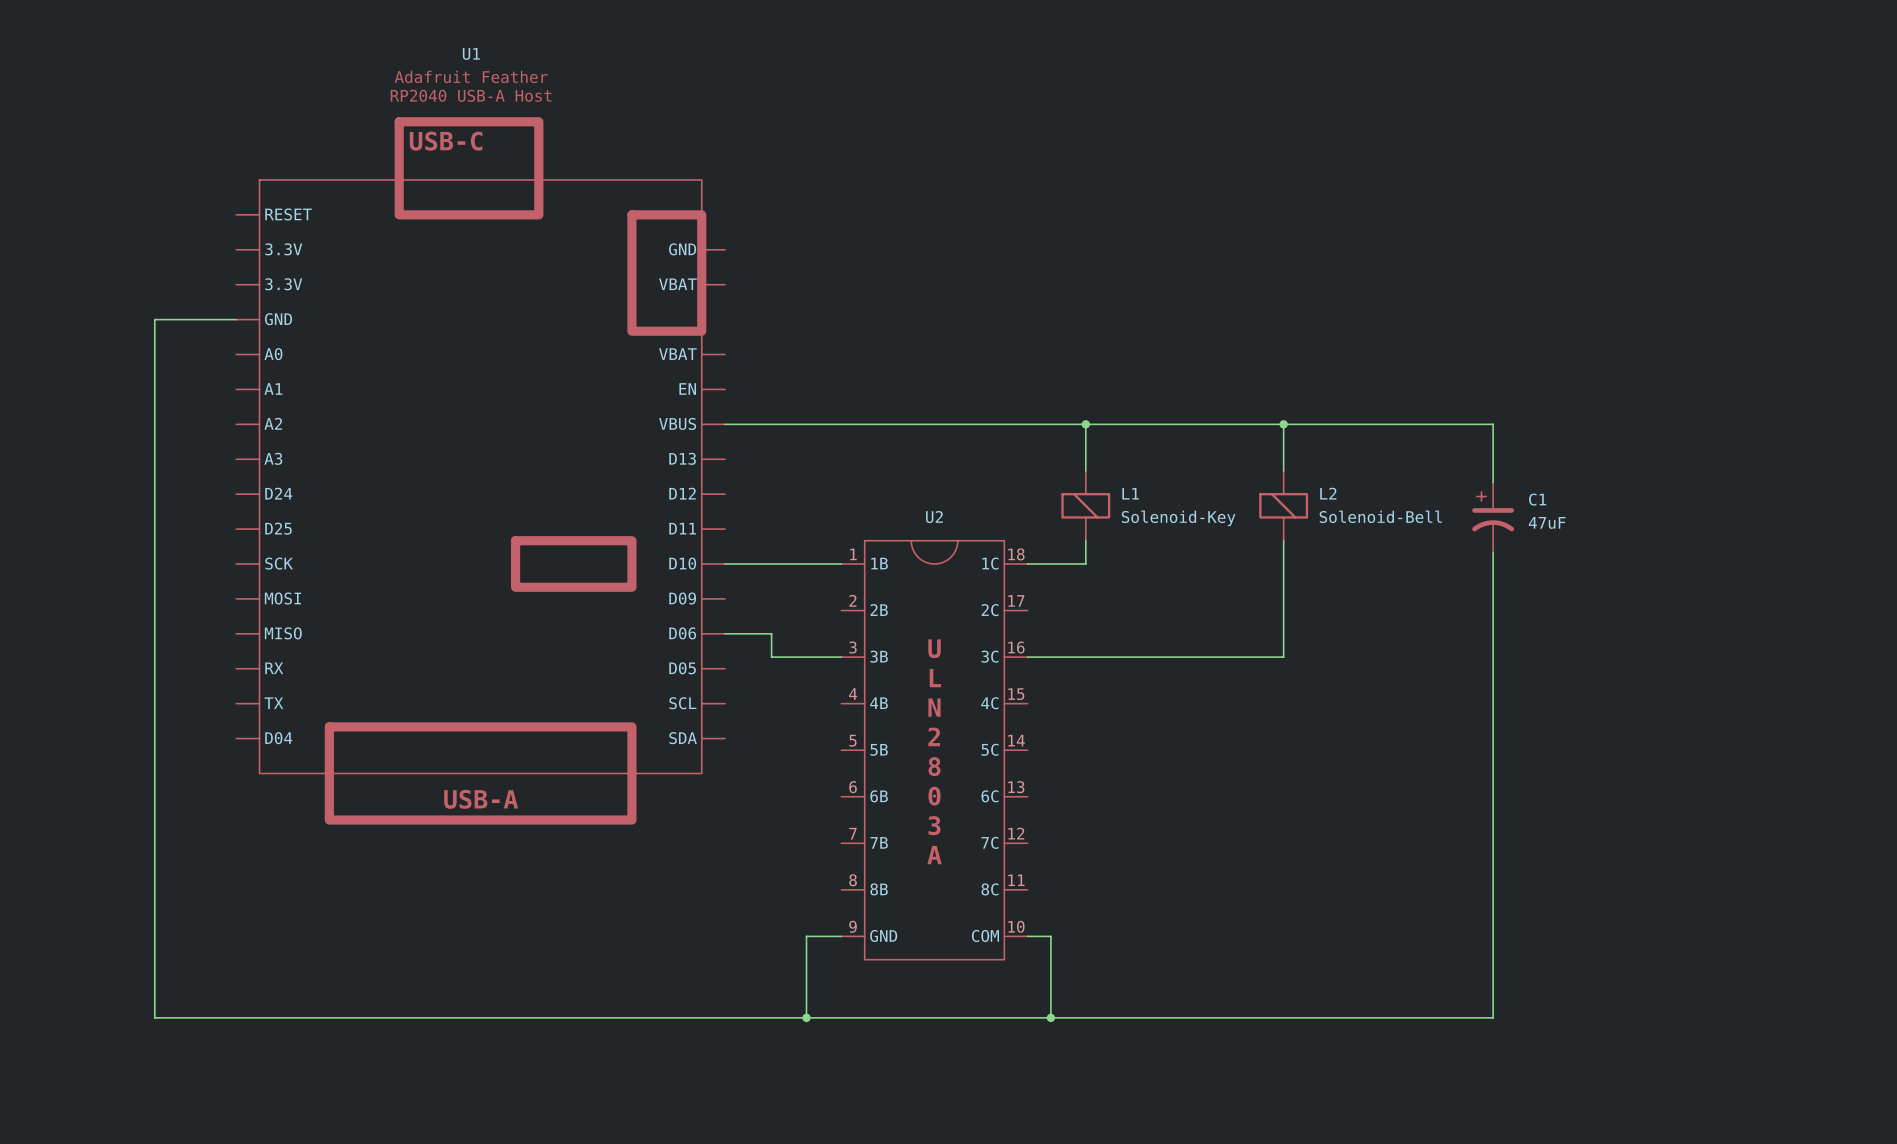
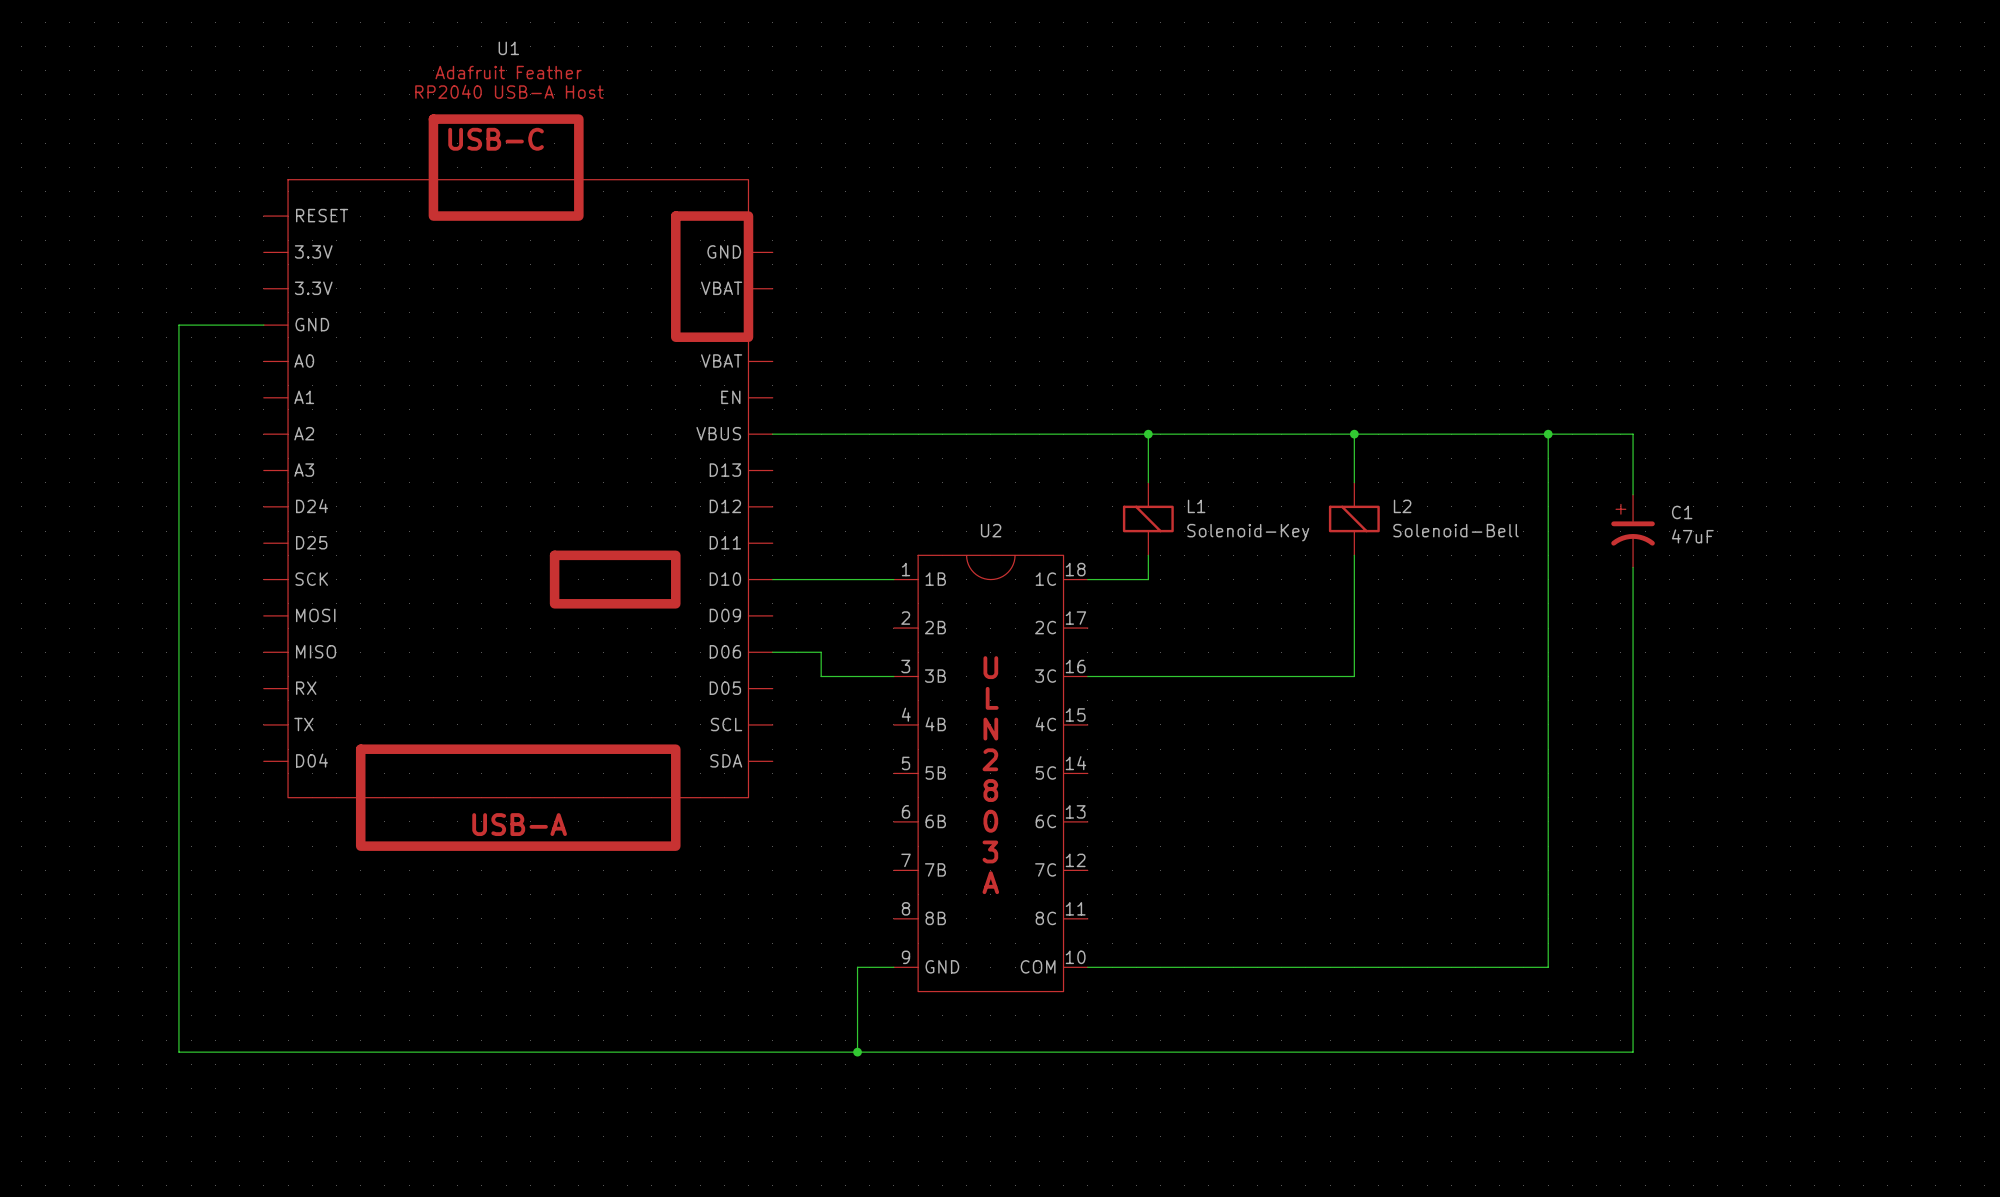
junction: none -> (1548, 434)
wire: (1493, 424) (1493, 482) -> (1572, 434) (1633, 434) (1633, 494)
C1 position: (1493, 517) -> (1633, 531)
wire: (1493, 552) (1493, 1017) -> (1633, 567) (1633, 1052) (1572, 1052)
wire: (1050, 936) (1050, 1017) -> (1112, 967) (1548, 967) (1548, 434)
junction: (1050, 1017) -> none

